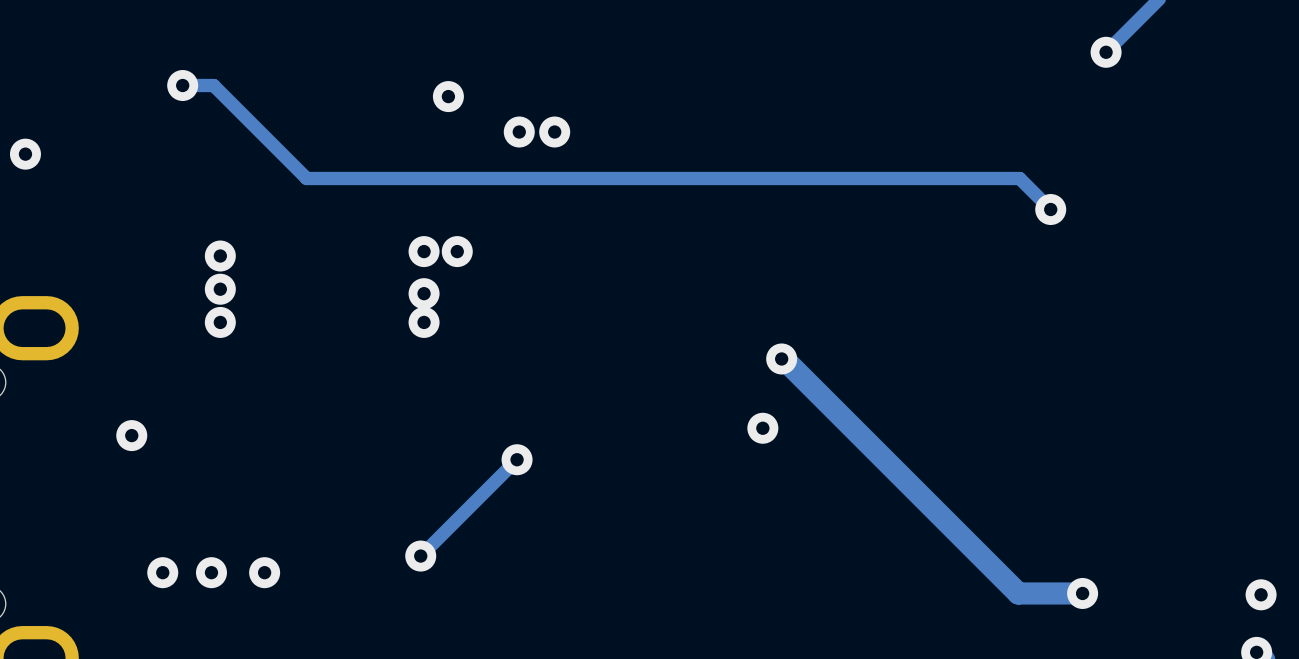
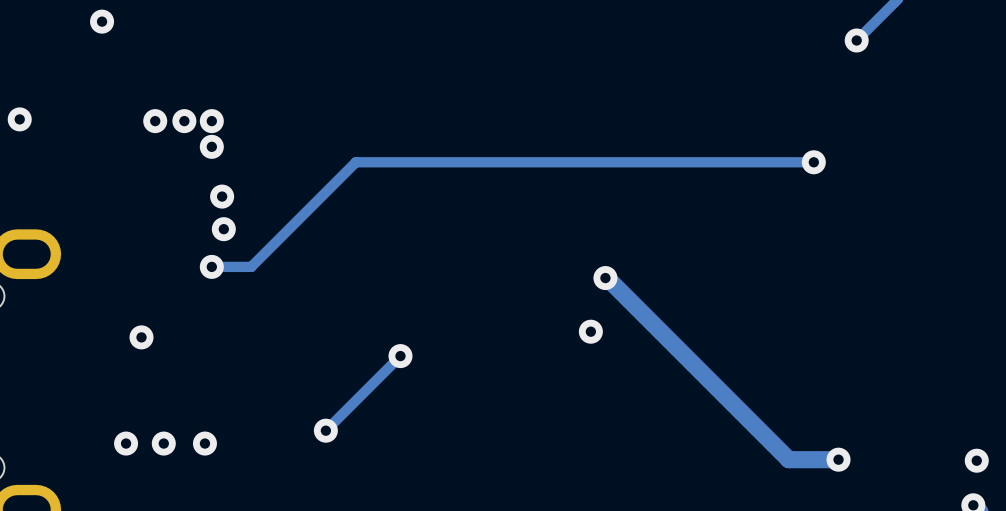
via: none -> (102, 21)
track: (182, 85) (213, 85) (306, 178) (1019, 178) (1050, 209) -> (211, 266) (251, 266) (355, 162) (813, 162)
via: (182, 85) -> none
via: (448, 96) -> none
via: (519, 132) -> none
via: (554, 132) -> none
via: none -> (155, 121)
via: none -> (184, 121)
via: none -> (211, 121)
via: none -> (211, 146)
via: (424, 251) -> none
via: (457, 251) -> none
via: none -> (222, 196)
via: (220, 256) -> none
via: (220, 289) -> none
via: (424, 293) -> none
via: none -> (223, 229)
via: (220, 322) -> none
via: (424, 322) -> none
via: none -> (211, 266)
via position: (131, 435) -> (141, 337)

